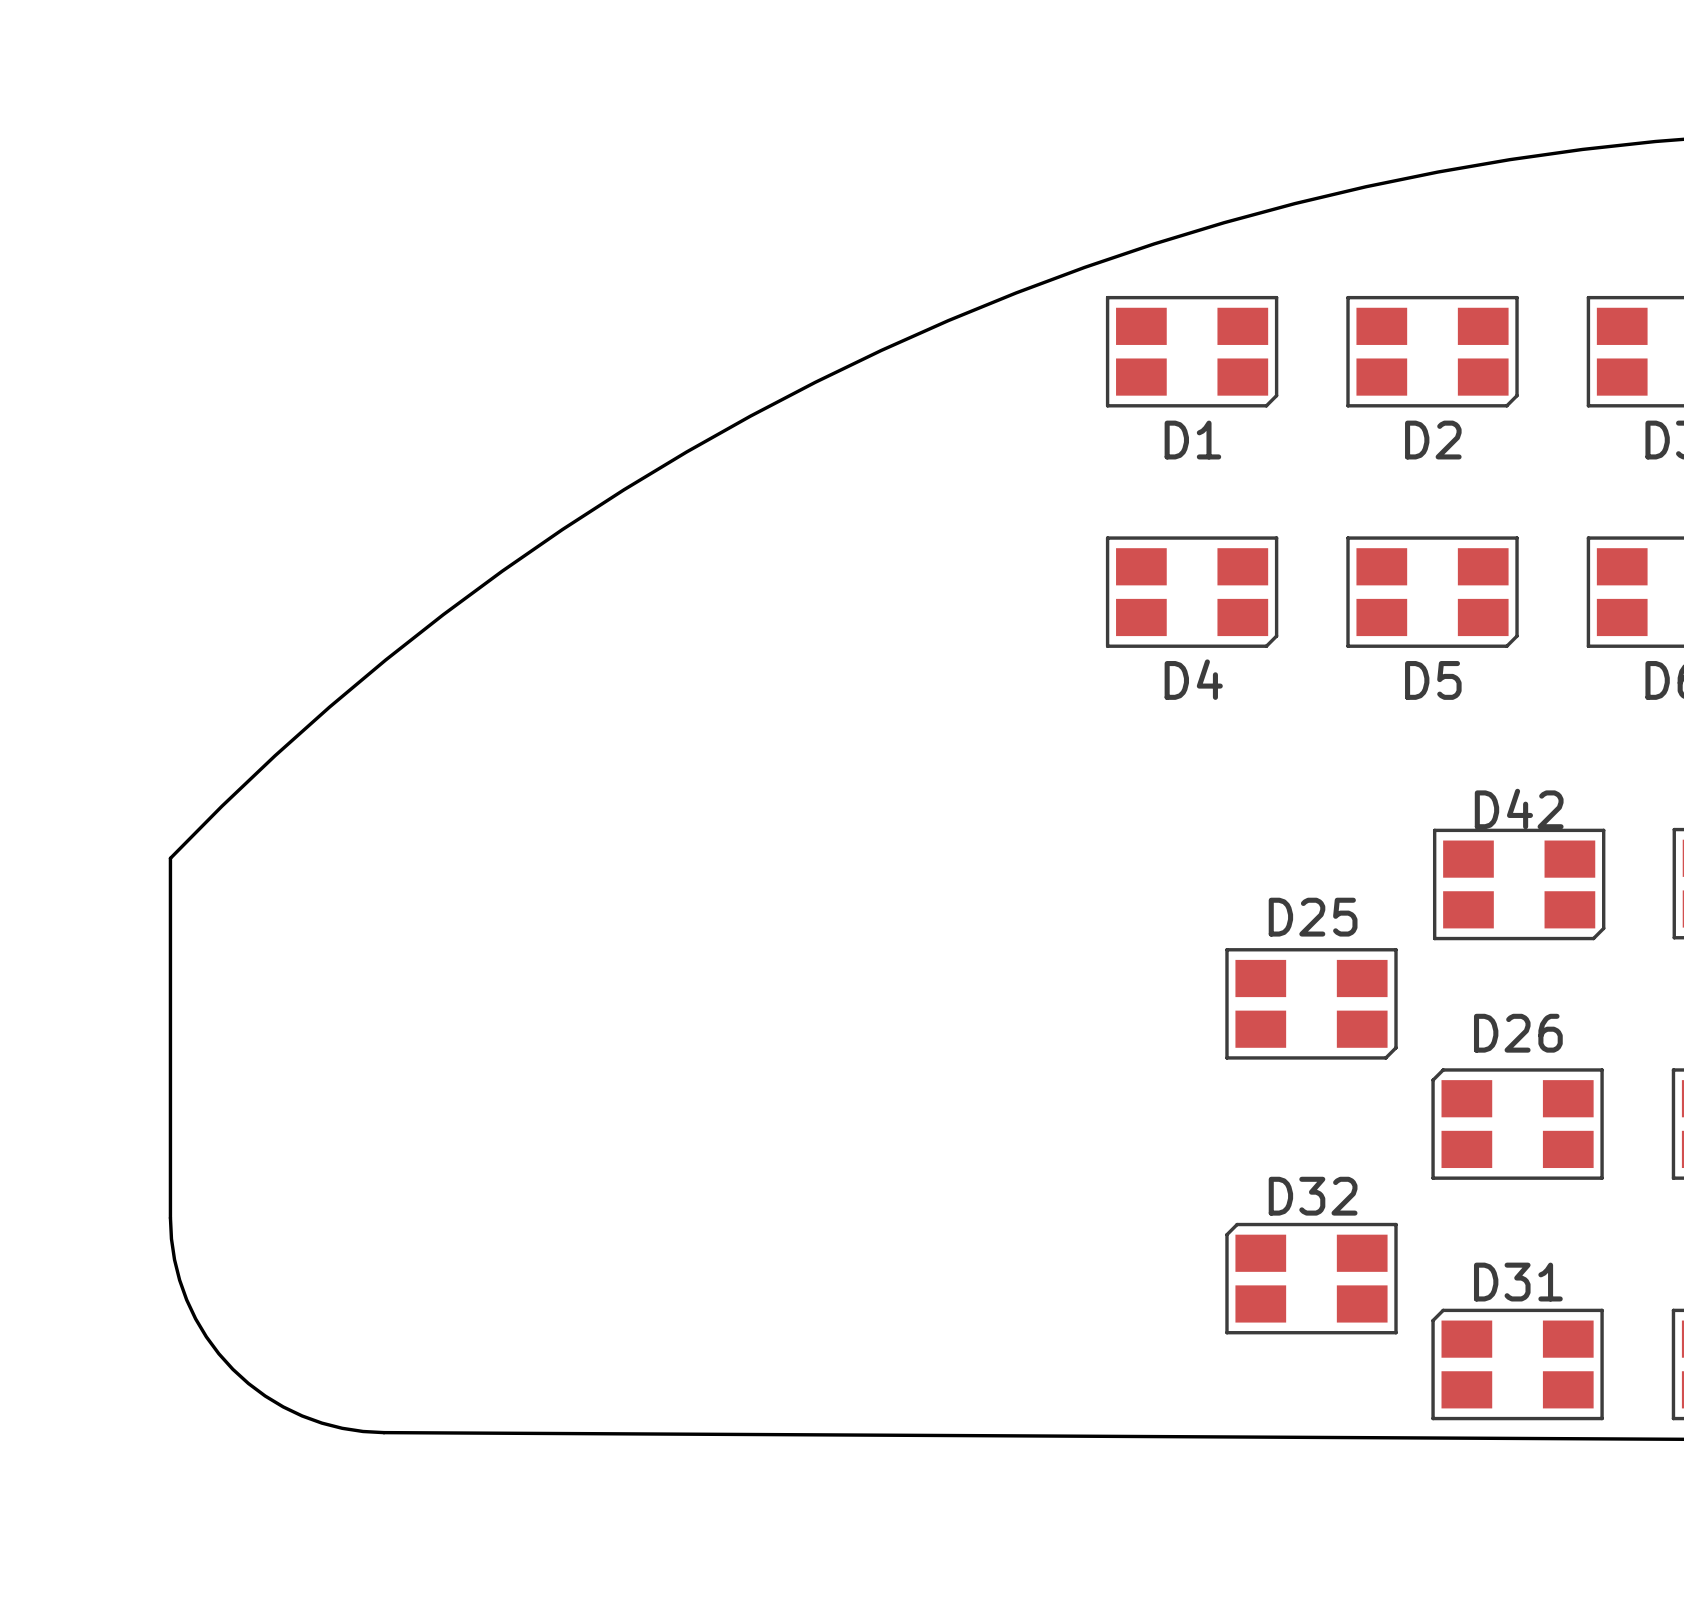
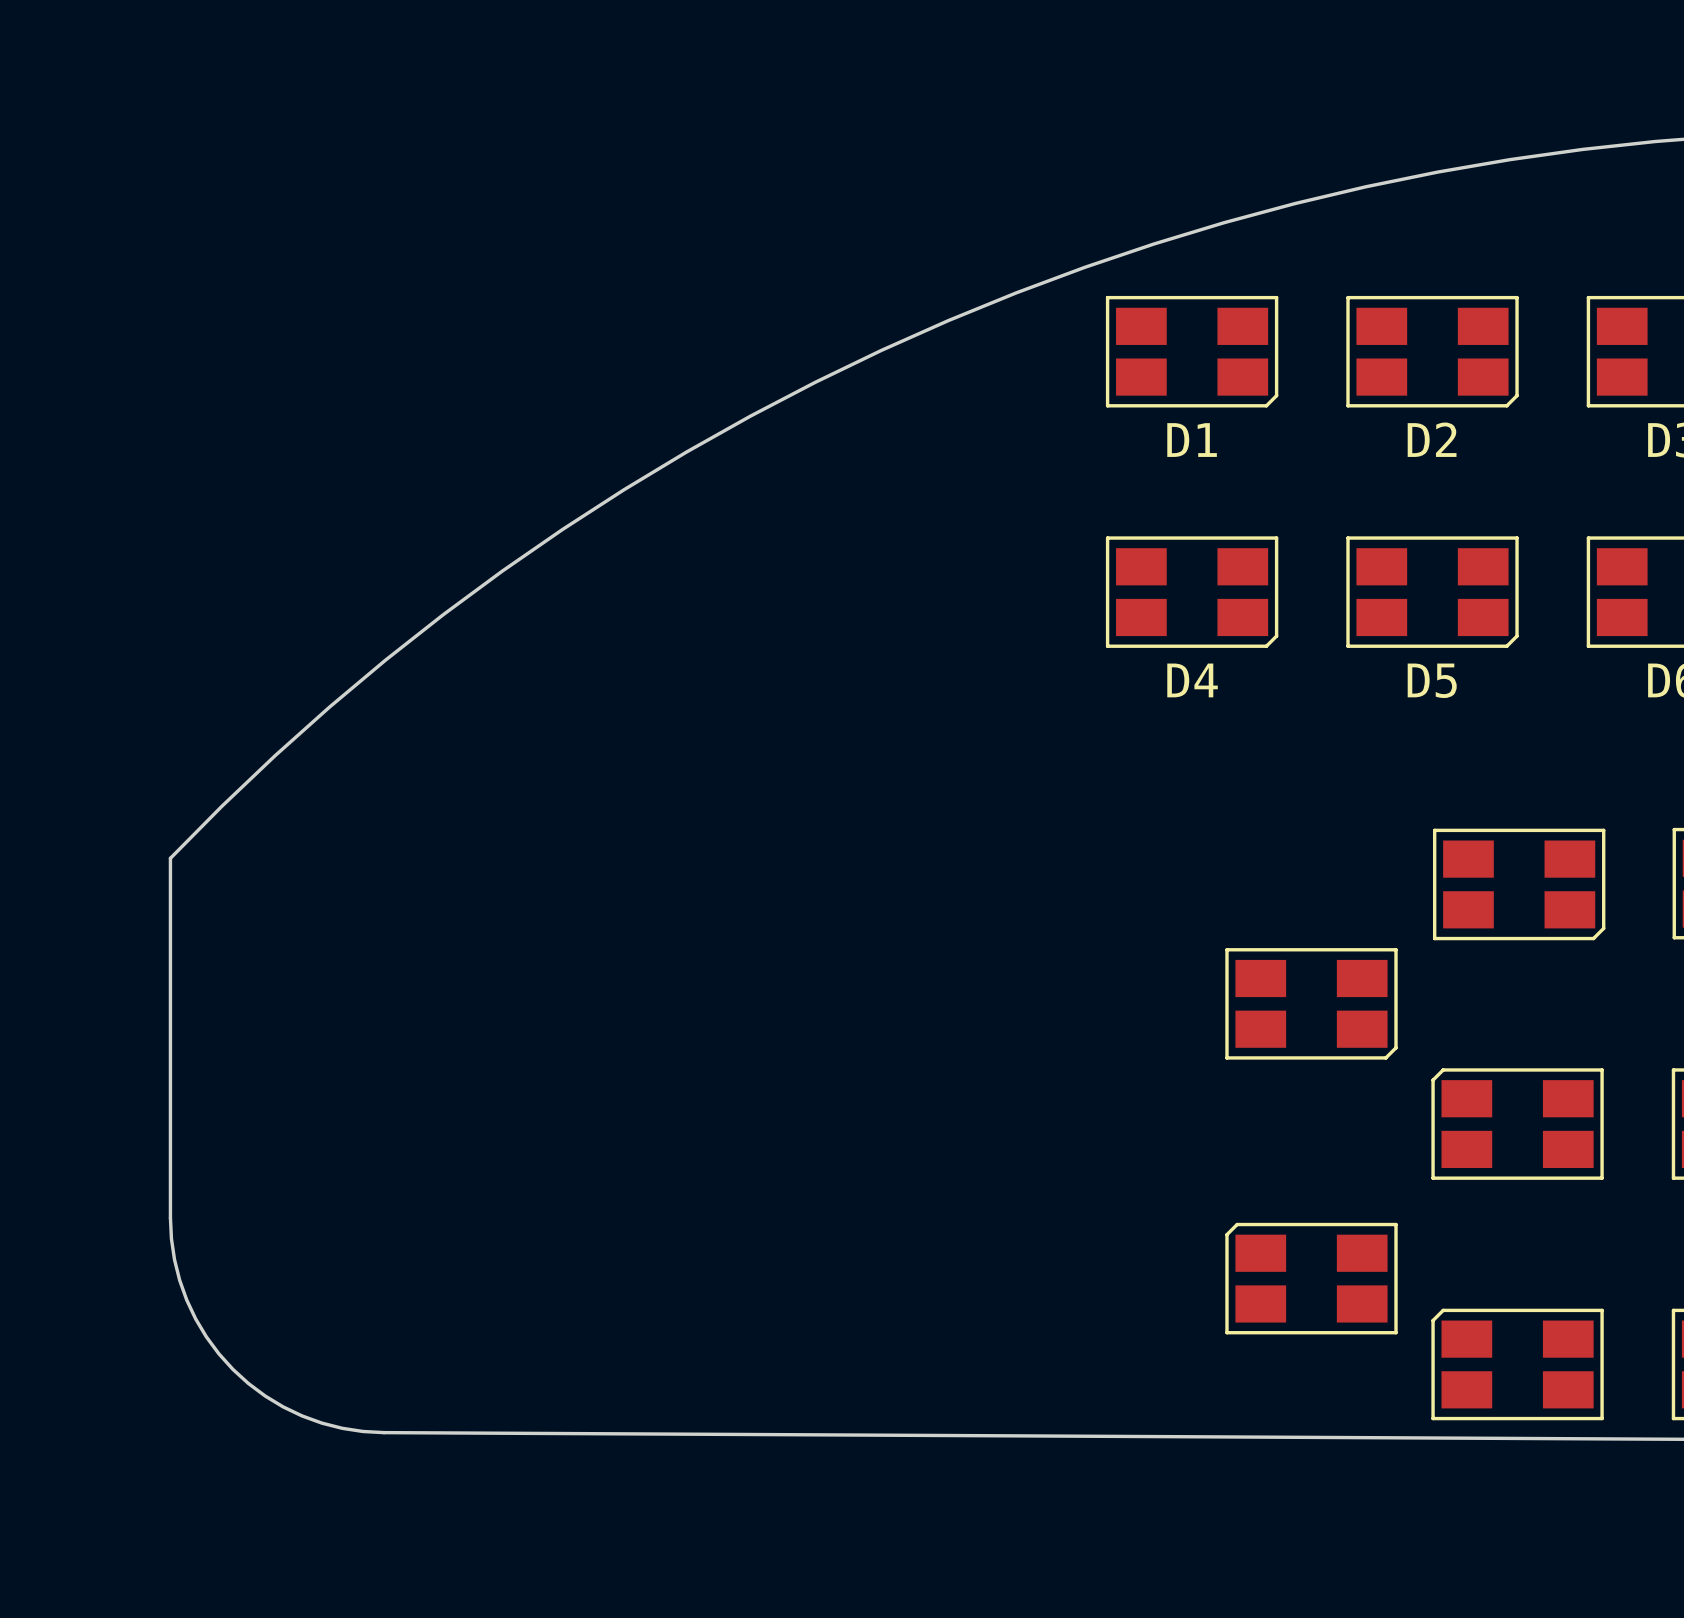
D42 name: D42 (1519, 809) -> none
D25 name: D25 (1313, 917) -> none
D26 name: D26 (1518, 1033) -> none
D32 name: D32 (1313, 1196) -> none
D31 name: D31 (1518, 1282) -> none

